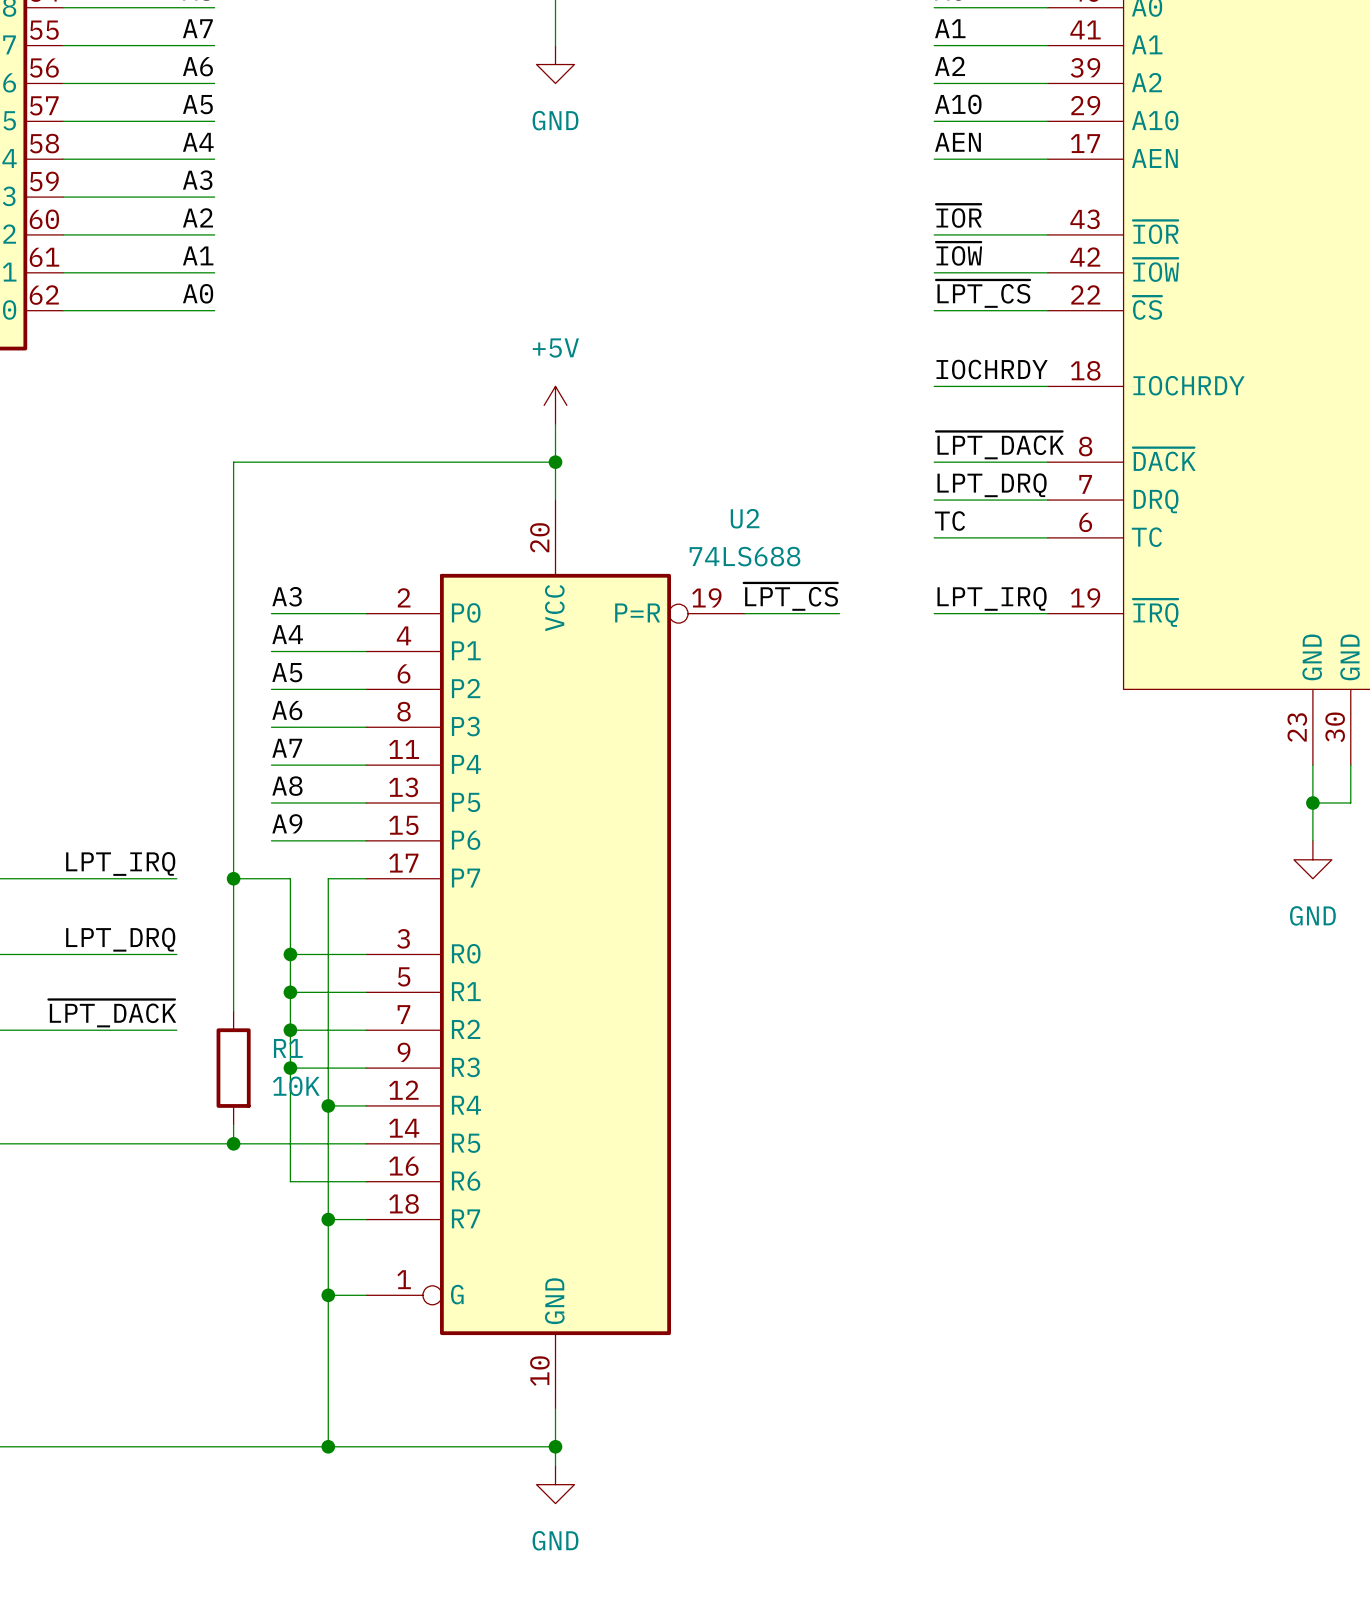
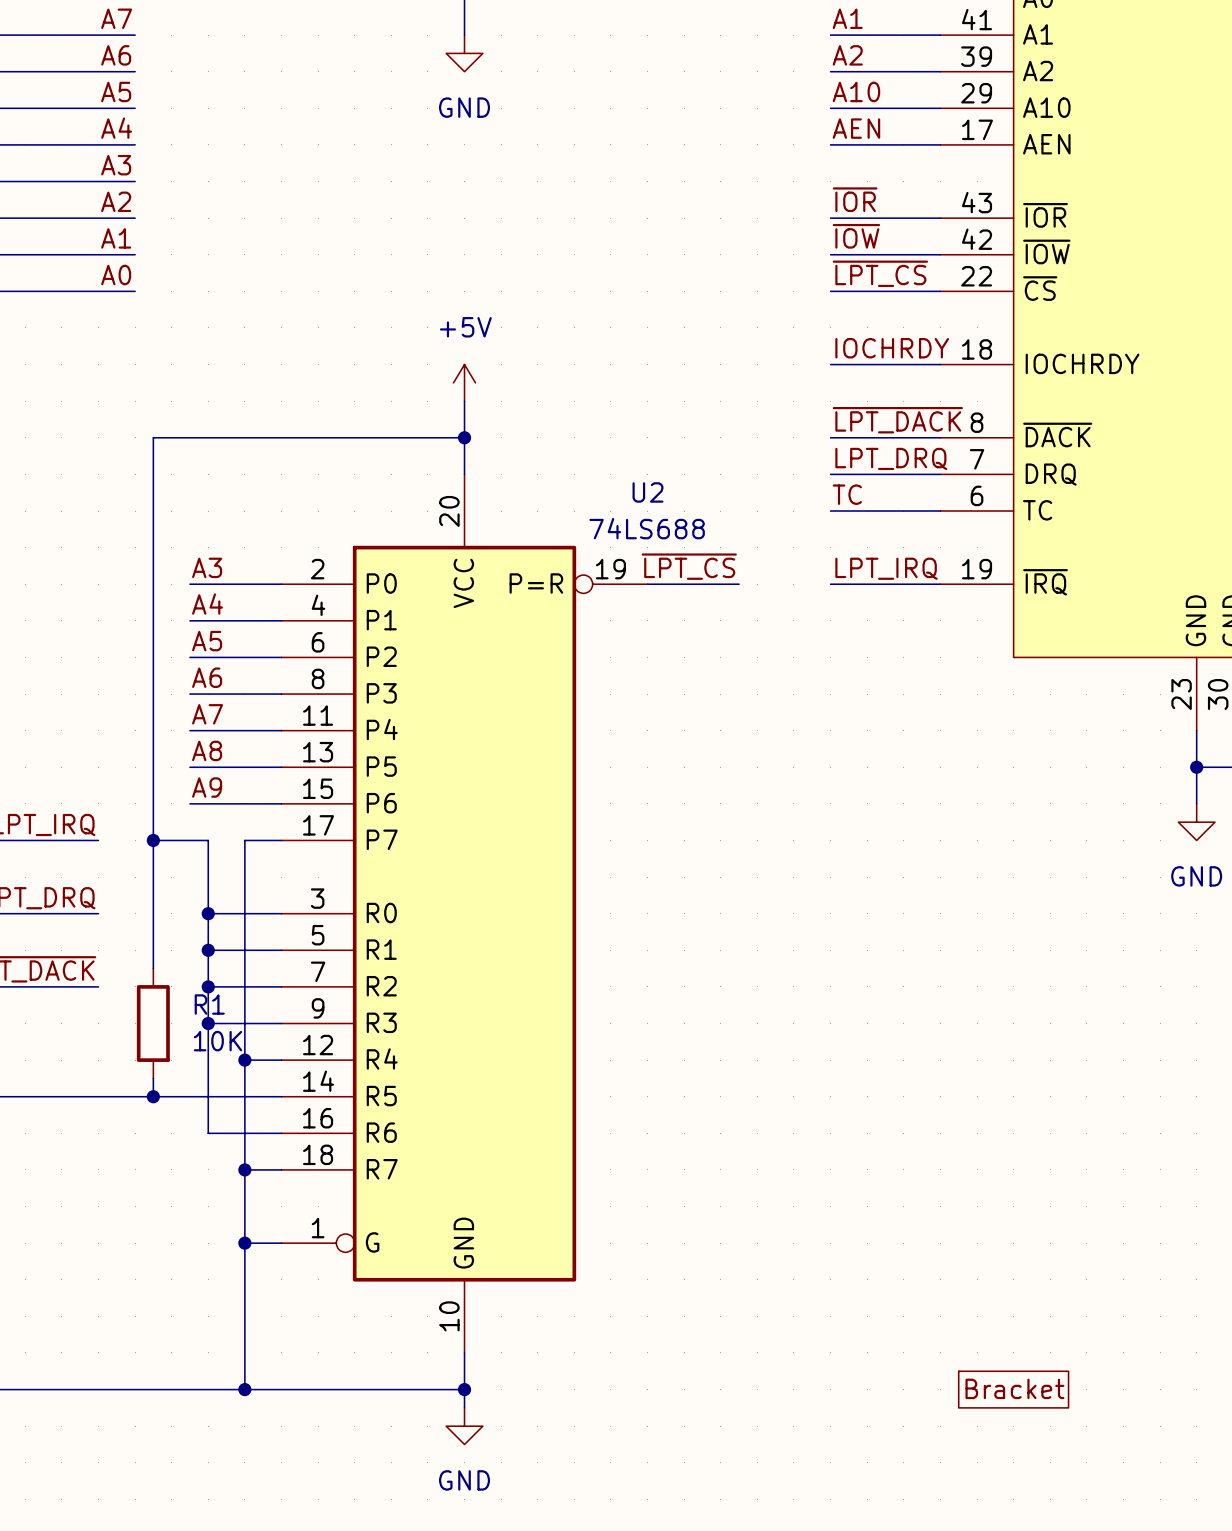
part: none -> (1013, 1389)

